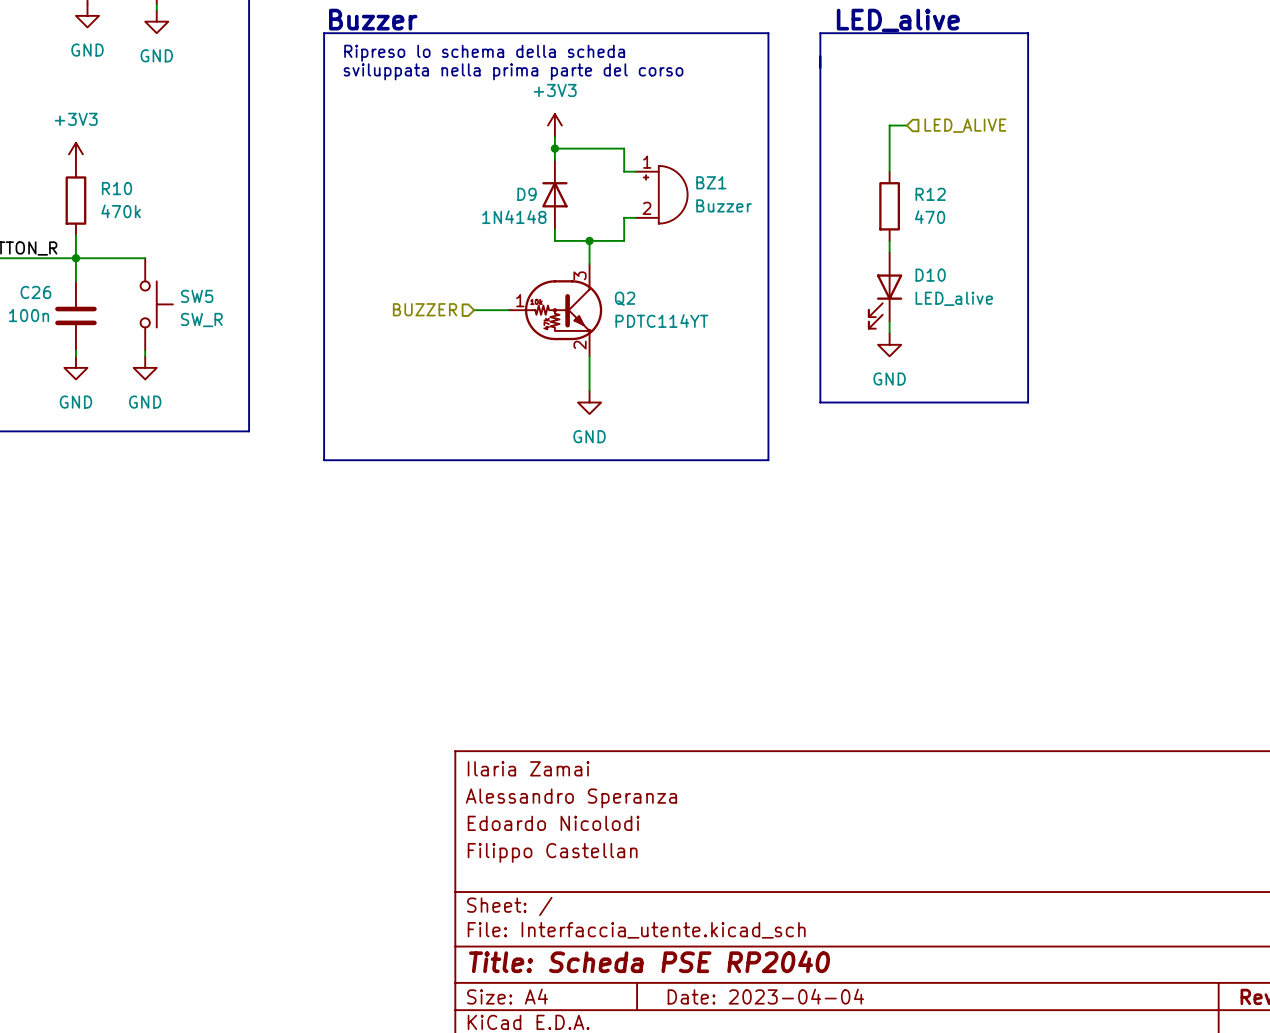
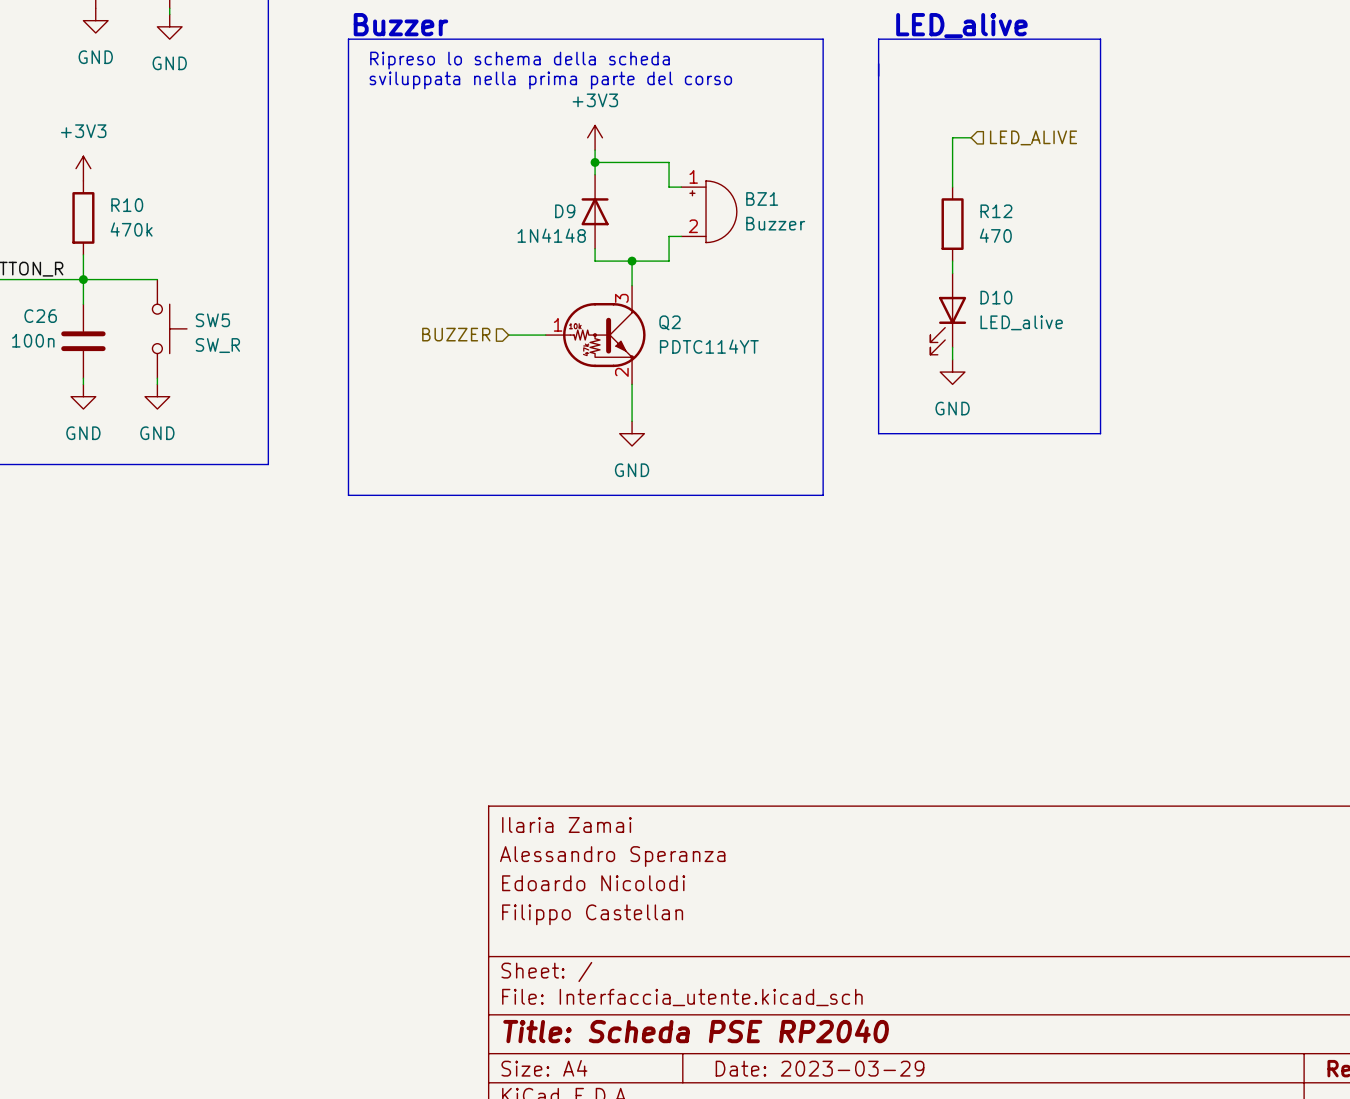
title block: Date: 2023-04-04 (765, 996) -> Date: 2023-03-29 (820, 1068)

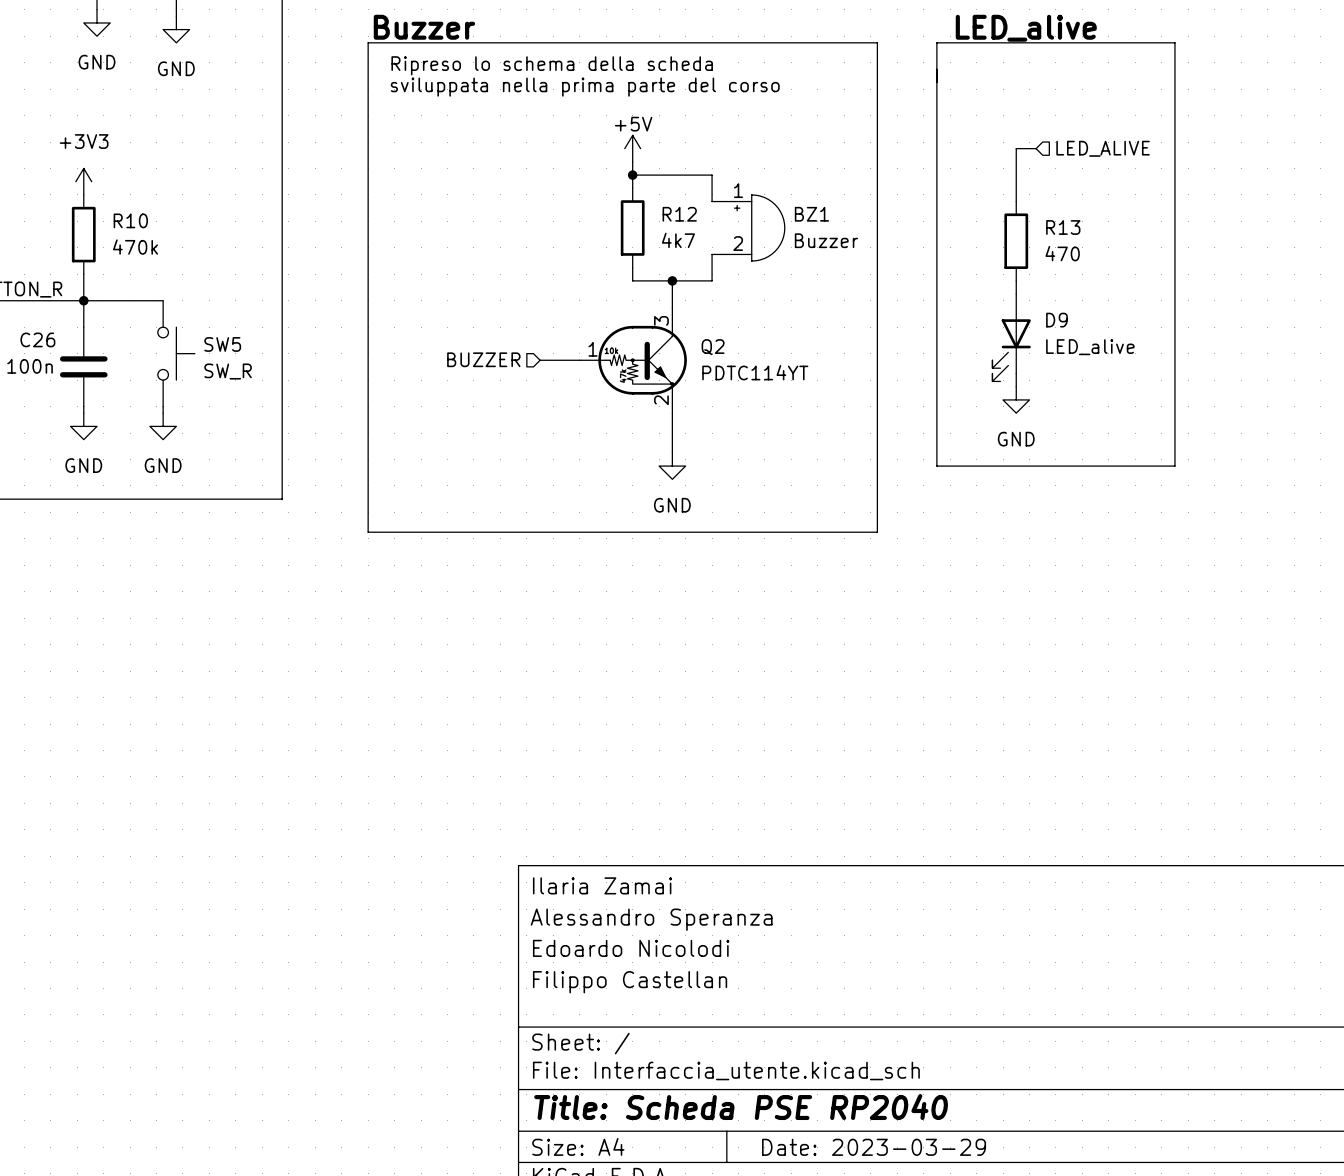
power symbol: +3V3 (595, 137) -> +5V (632, 148)
D9: 1N4148 (595, 211) -> none
R12: none -> 4k7 (632, 228)
R12 name: R12 (996, 211) -> R13 (1063, 227)
D10 name: D10 (996, 297) -> D9 (1056, 320)

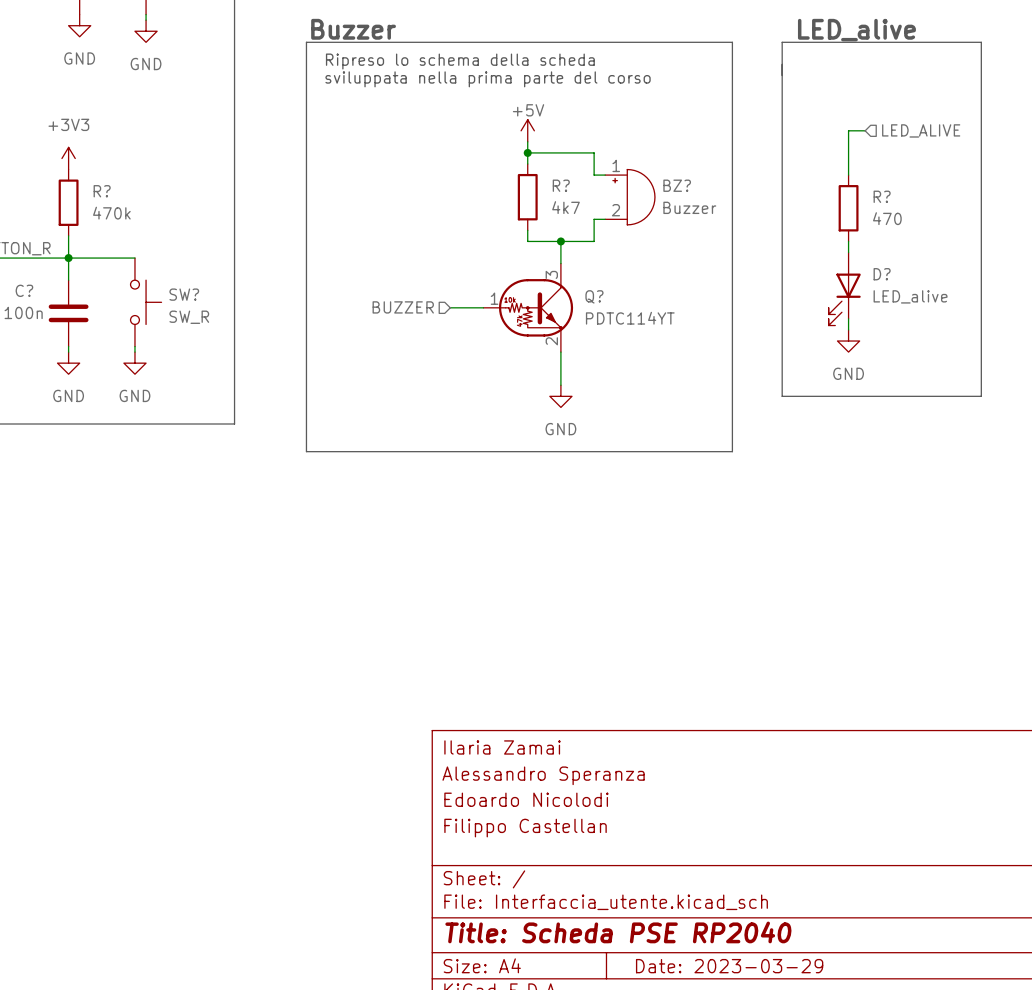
R12 name: R12 (679, 214) -> R? (561, 185)
BZ1 name: BZ1 (811, 214) -> BZ? (677, 185)
R10 name: R10 (130, 220) -> R? (102, 191)
R13 name: R13 (1063, 227) -> R? (882, 196)
D9 name: D9 (1056, 320) -> D? (882, 274)
C26 name: C26 (37, 339) -> C? (24, 290)
SW5 name: SW5 (222, 344) -> SW? (184, 294)
Q2 name: Q2 (713, 347) -> Q? (594, 296)

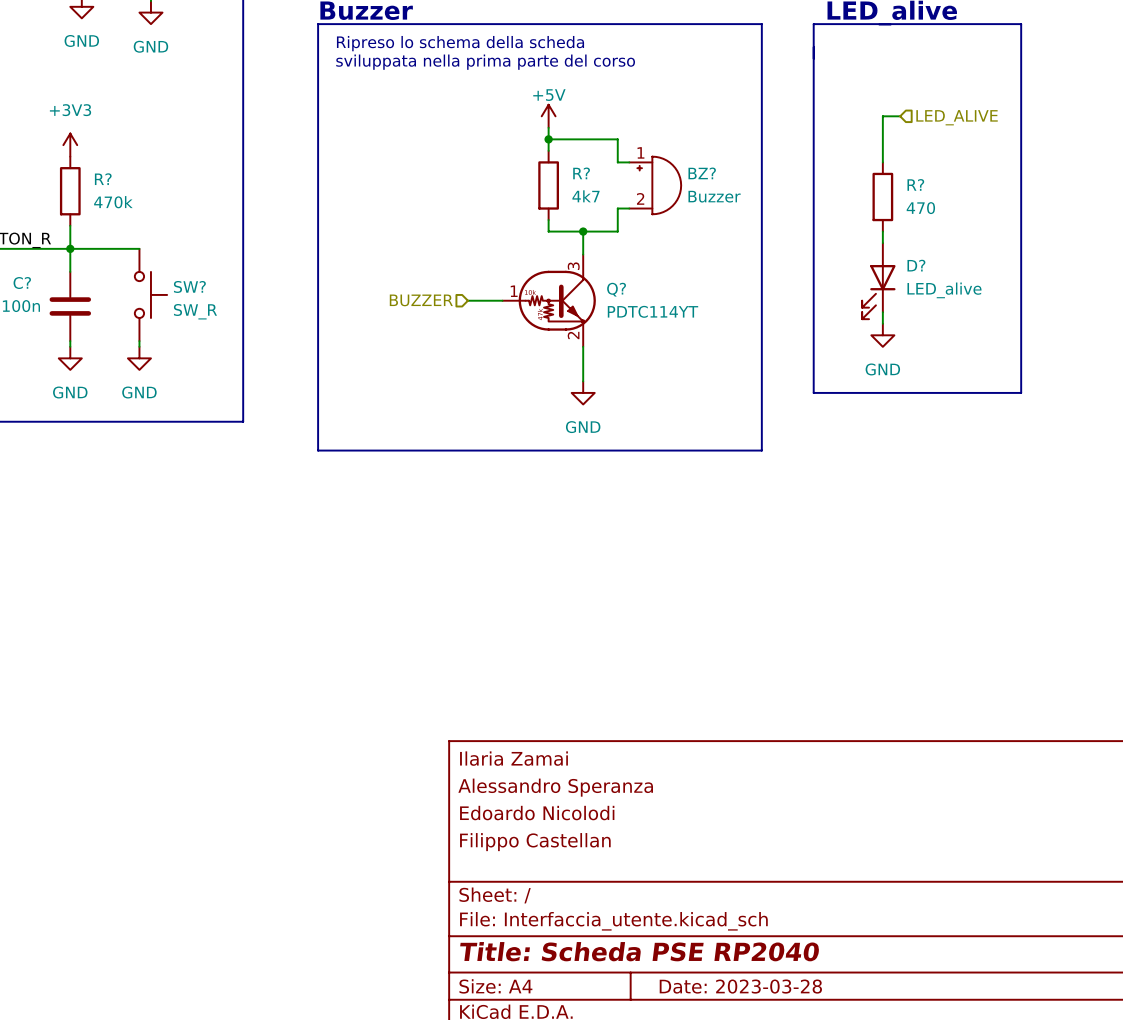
title block: Date: 2023-03-29 (729, 966) -> Date: 2023-03-28 (740, 986)

